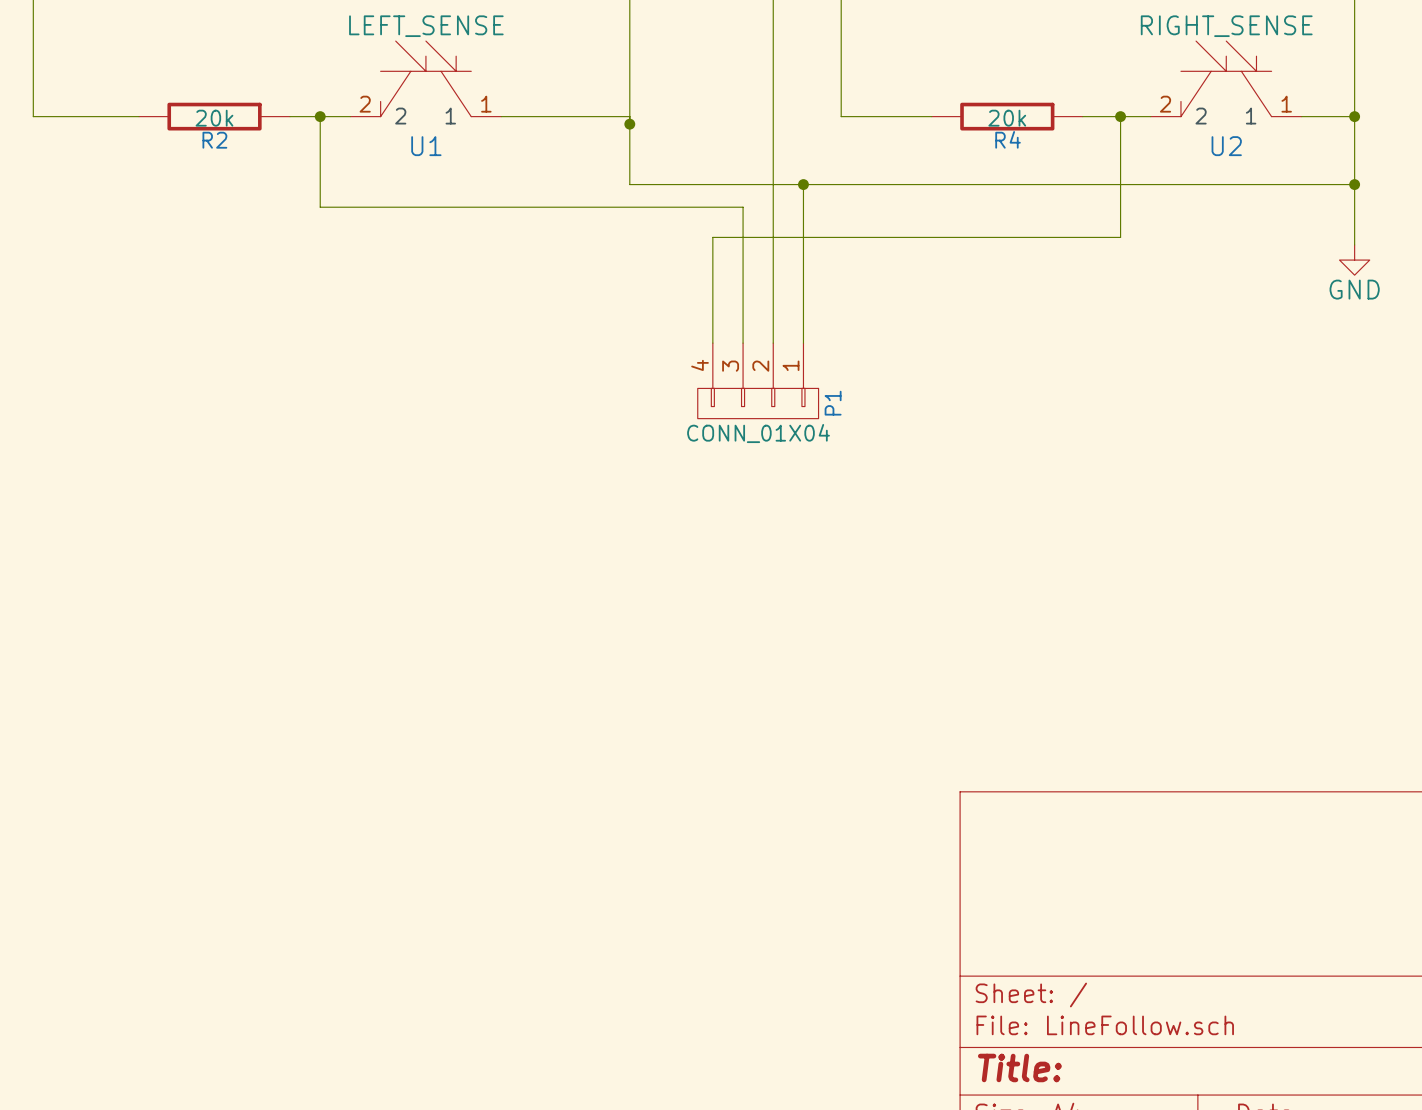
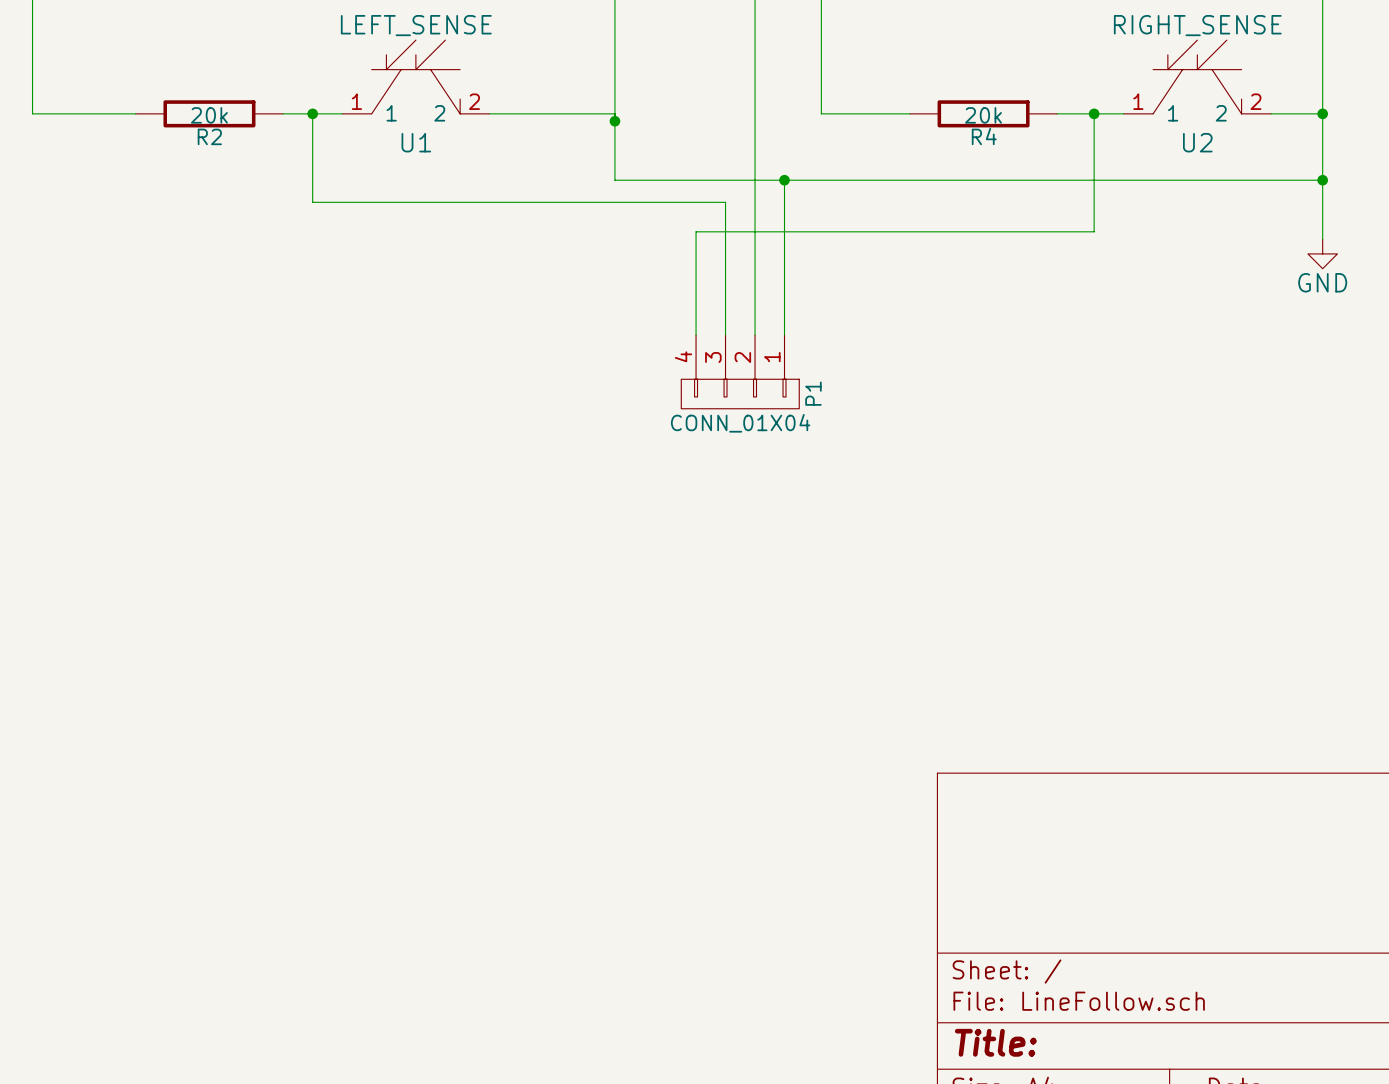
U1 flip: as is (425, 78) -> left-right (415, 77)
U2 flip: as is (1226, 78) -> left-right (1197, 77)

